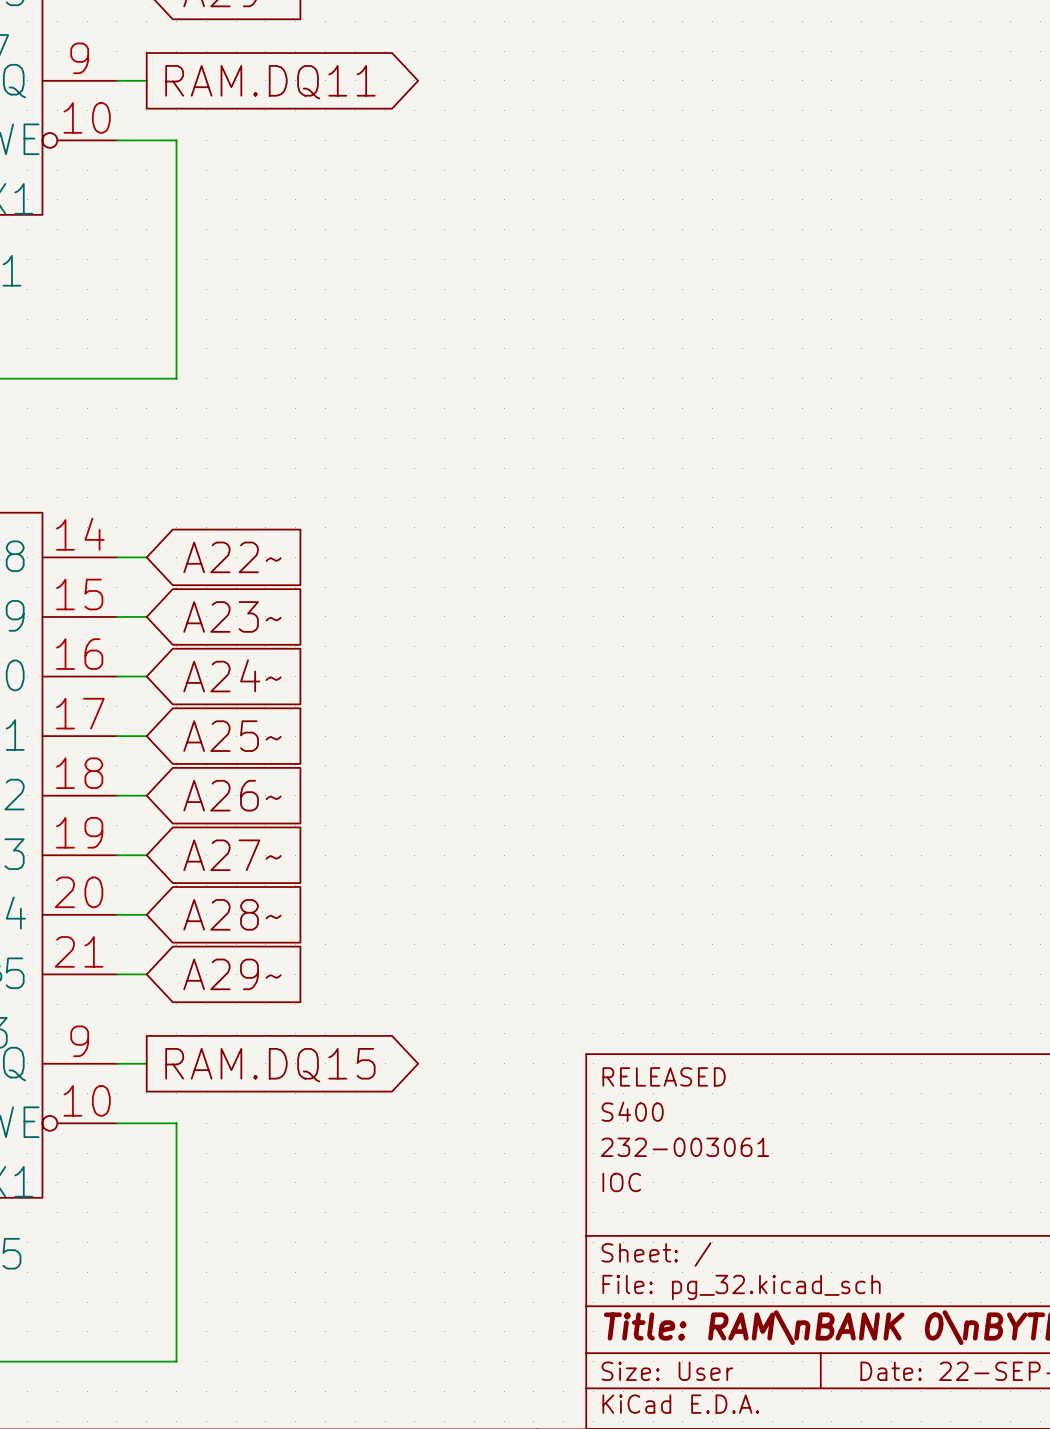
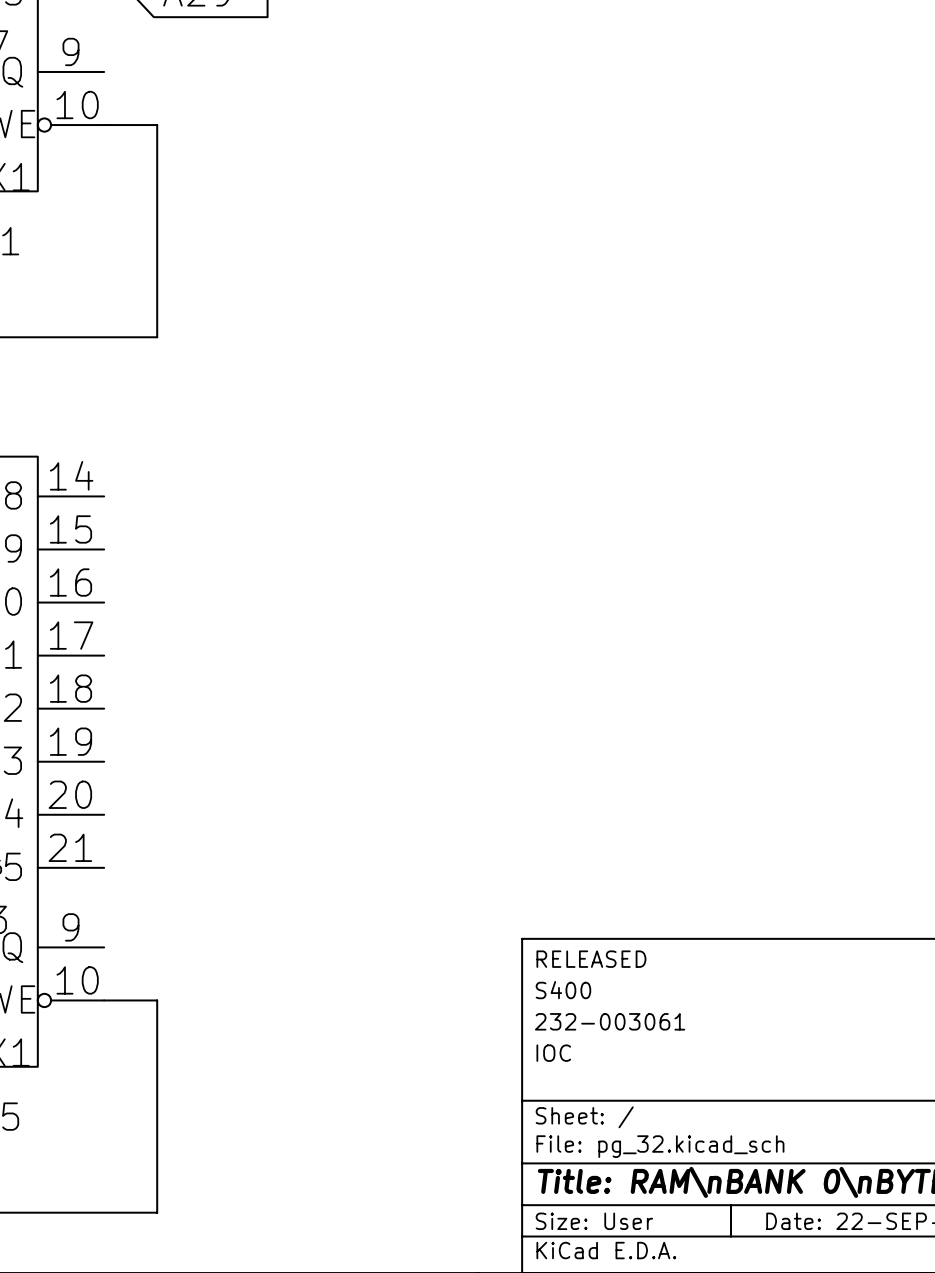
wire: (116, 80) (146, 80) -> none
global label: RAM.DQ11 (270, 82) -> none
wire: (116, 557) (146, 557) -> none
global label: A22~ (232, 557) -> none
wire: (116, 616) (146, 616) -> none
global label: A23~ (232, 616) -> none
global label: A24~ (232, 675) -> none
wire: (116, 676) (146, 676) -> none
wire: (116, 736) (146, 736) -> none
global label: A25~ (232, 736) -> none
wire: (116, 795) (146, 795) -> none
global label: A26~ (232, 795) -> none
wire: (116, 855) (146, 855) -> none
global label: A27~ (232, 855) -> none
wire: (116, 914) (146, 914) -> none
global label: A28~ (232, 914) -> none
wire: (116, 974) (146, 974) -> none
global label: A29~ (232, 974) -> none
wire: (116, 1063) (146, 1063) -> none
global label: RAM.DQ15 (270, 1065) -> none

